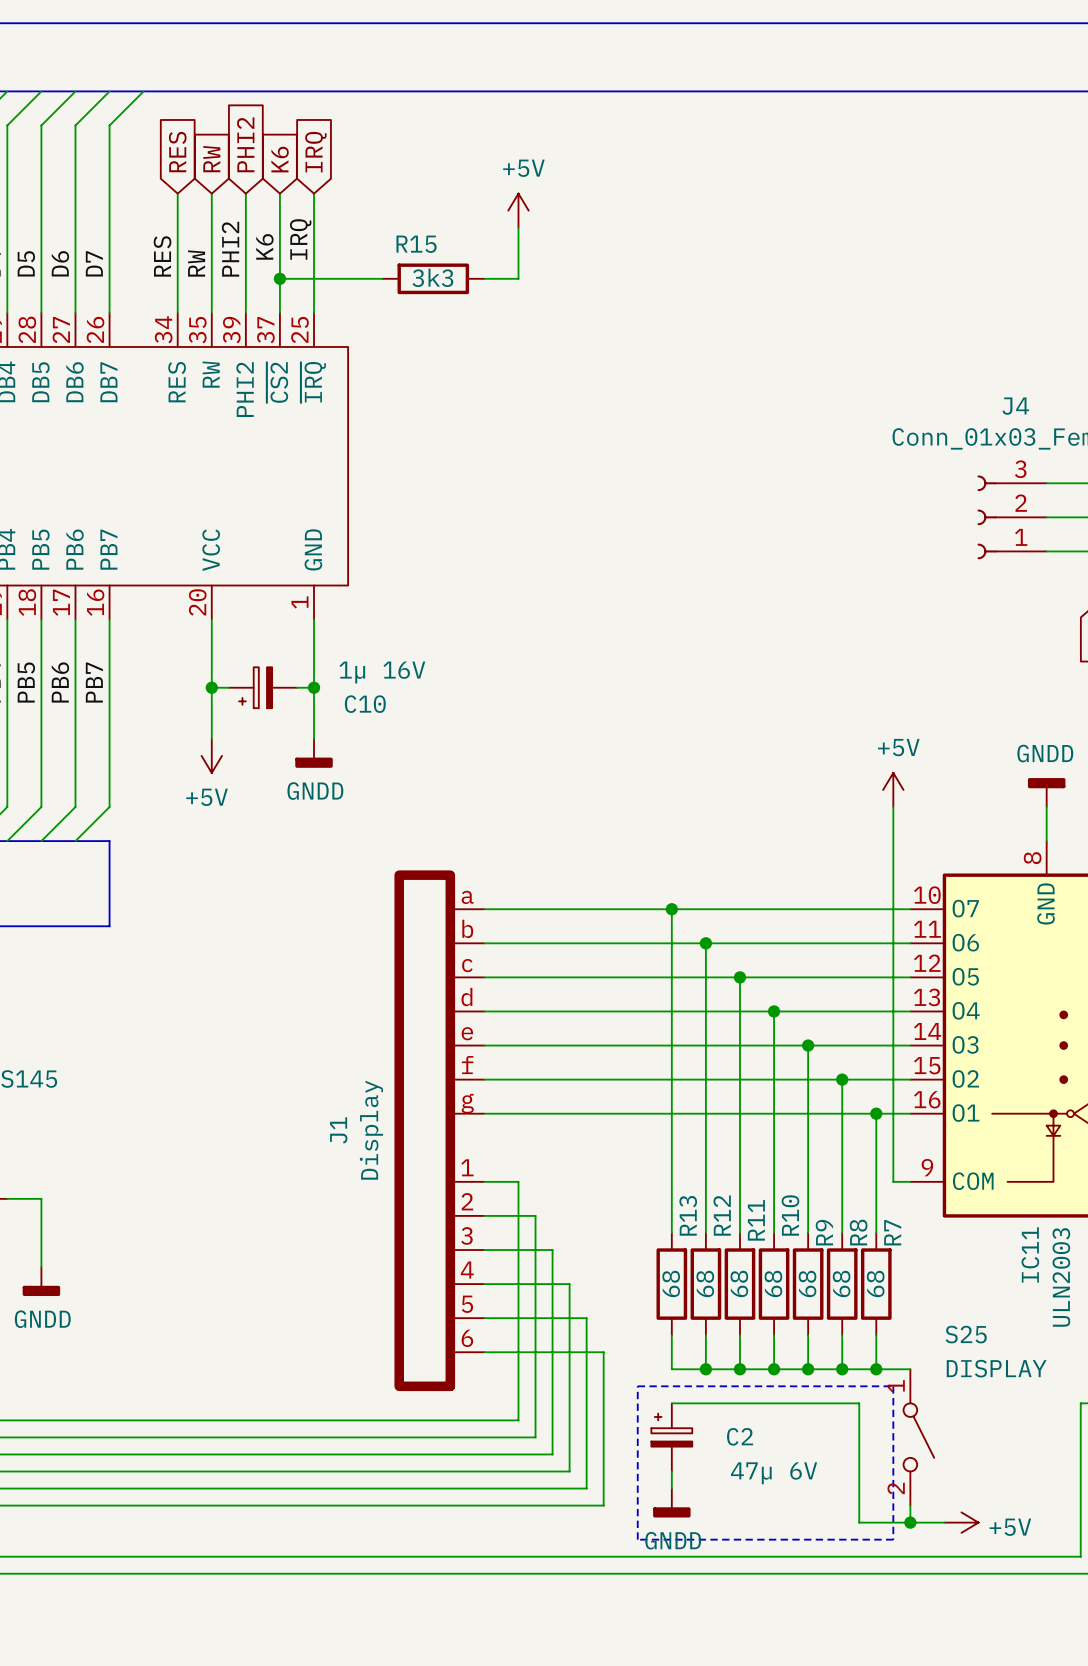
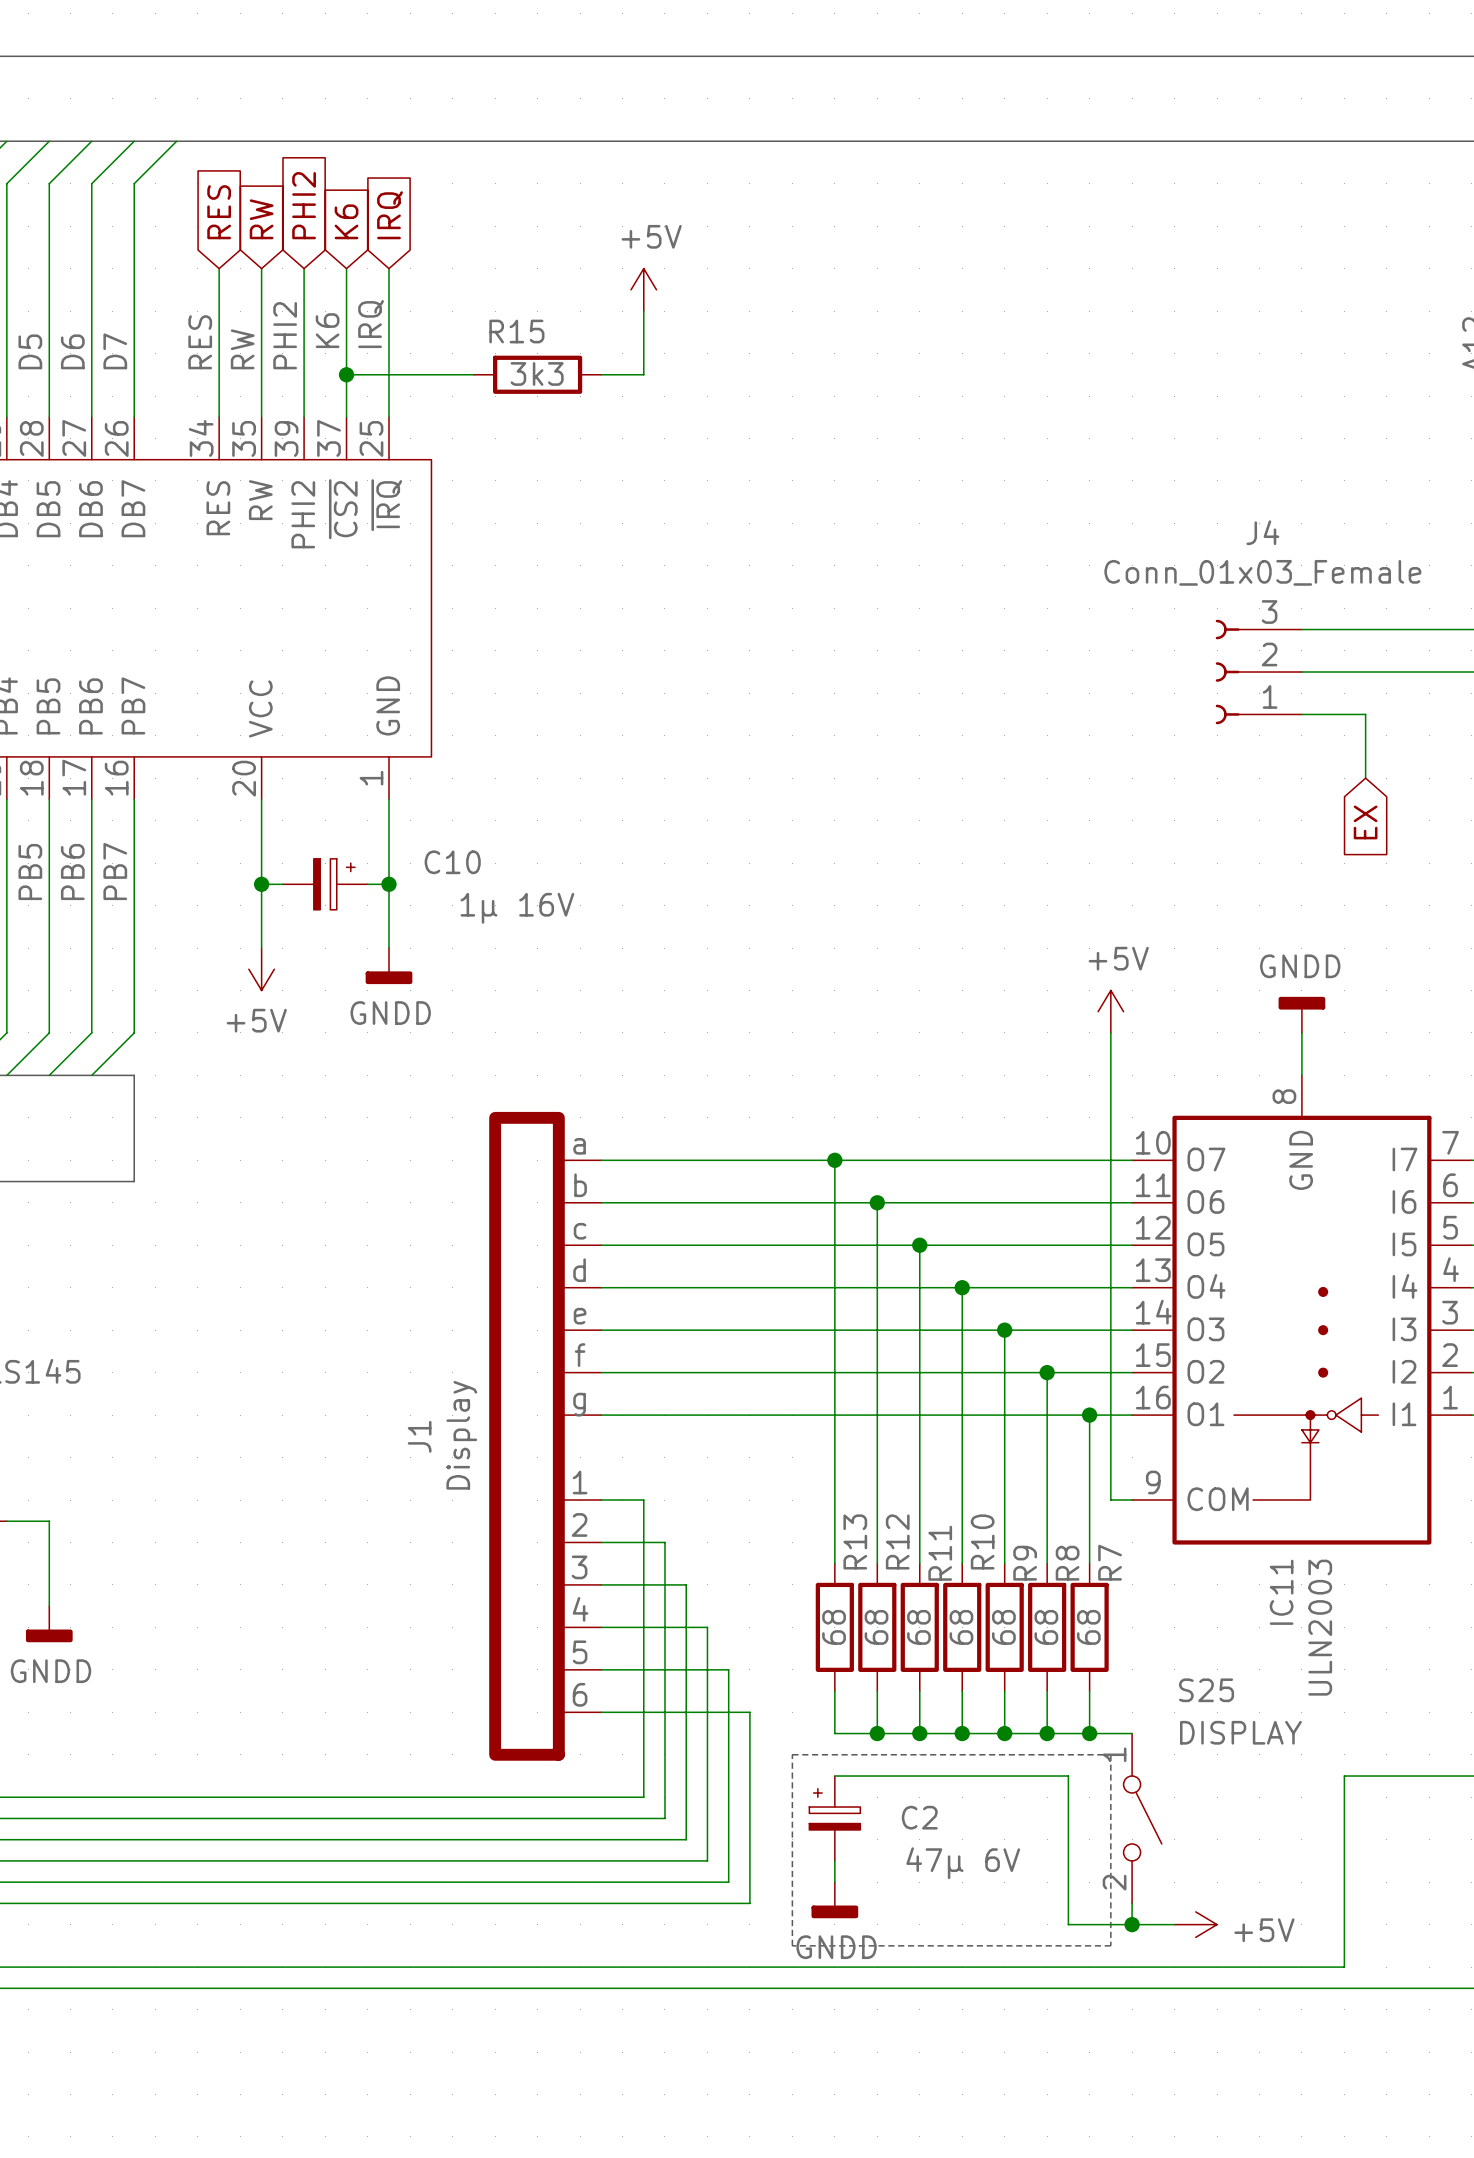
C10 value position: 1µ 16V (382, 672) -> 1µ 16V (517, 908)
C10 rotation: 0° (255, 687) -> 180° (334, 884)
C10 name position: C10 (365, 704) -> C10 (452, 862)

